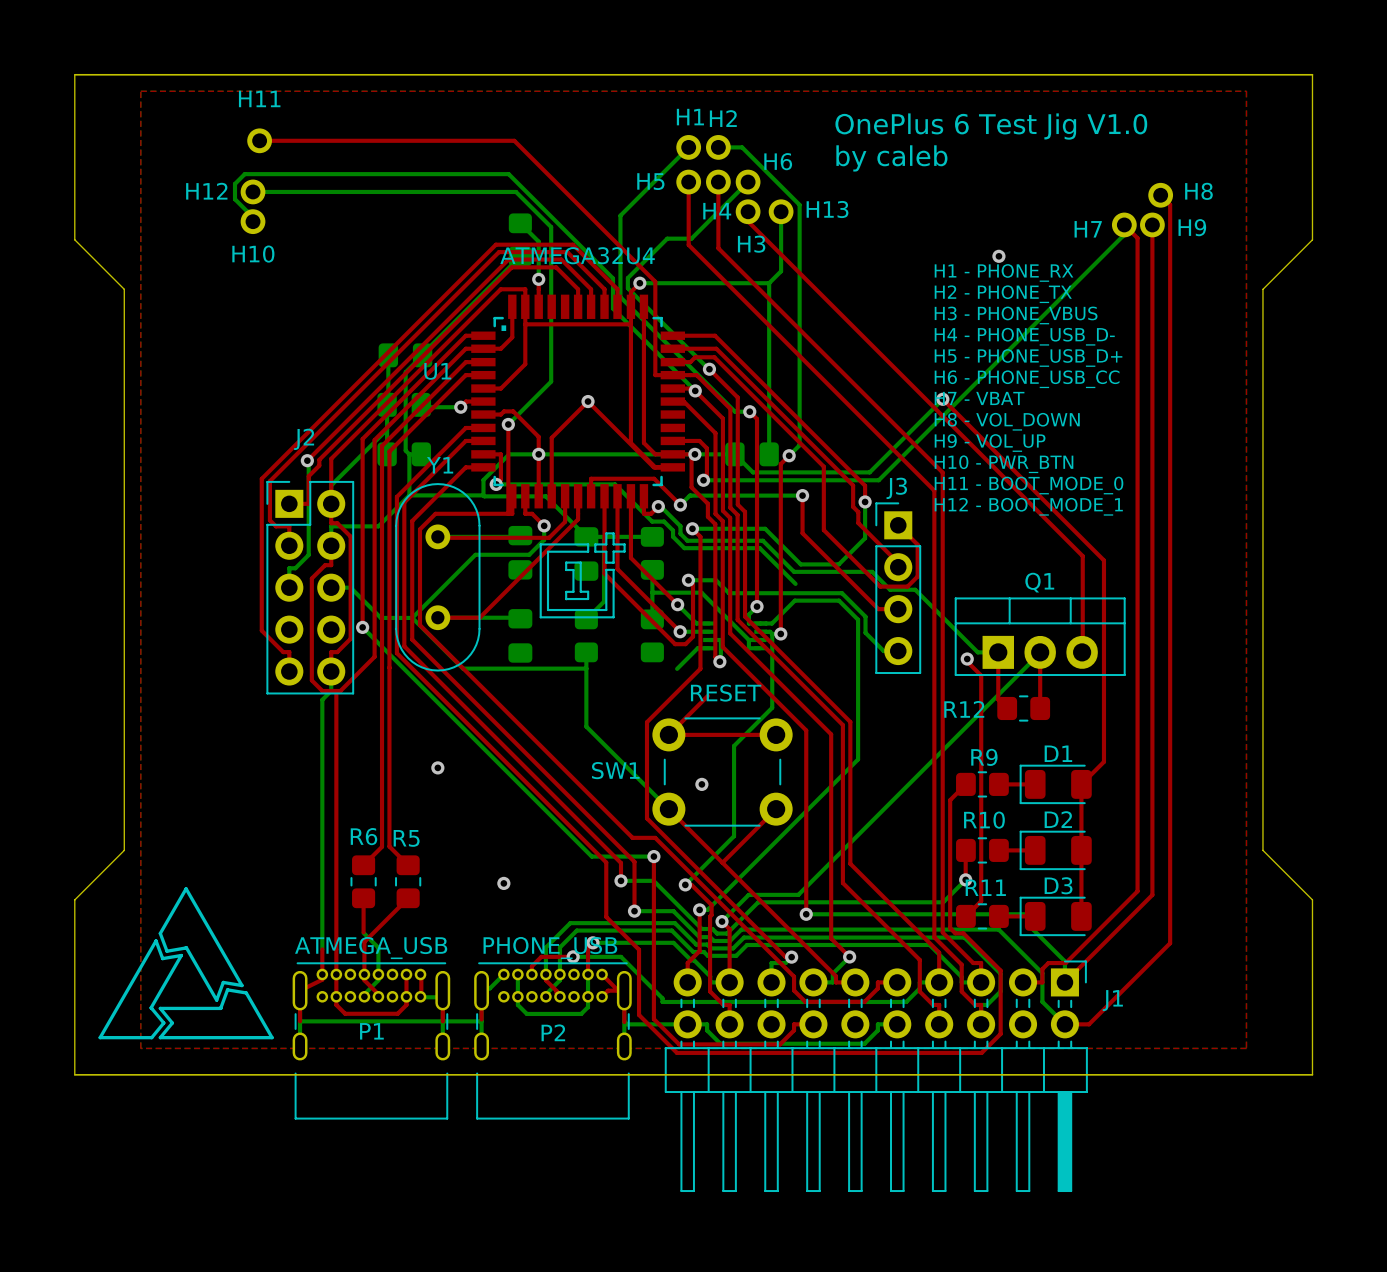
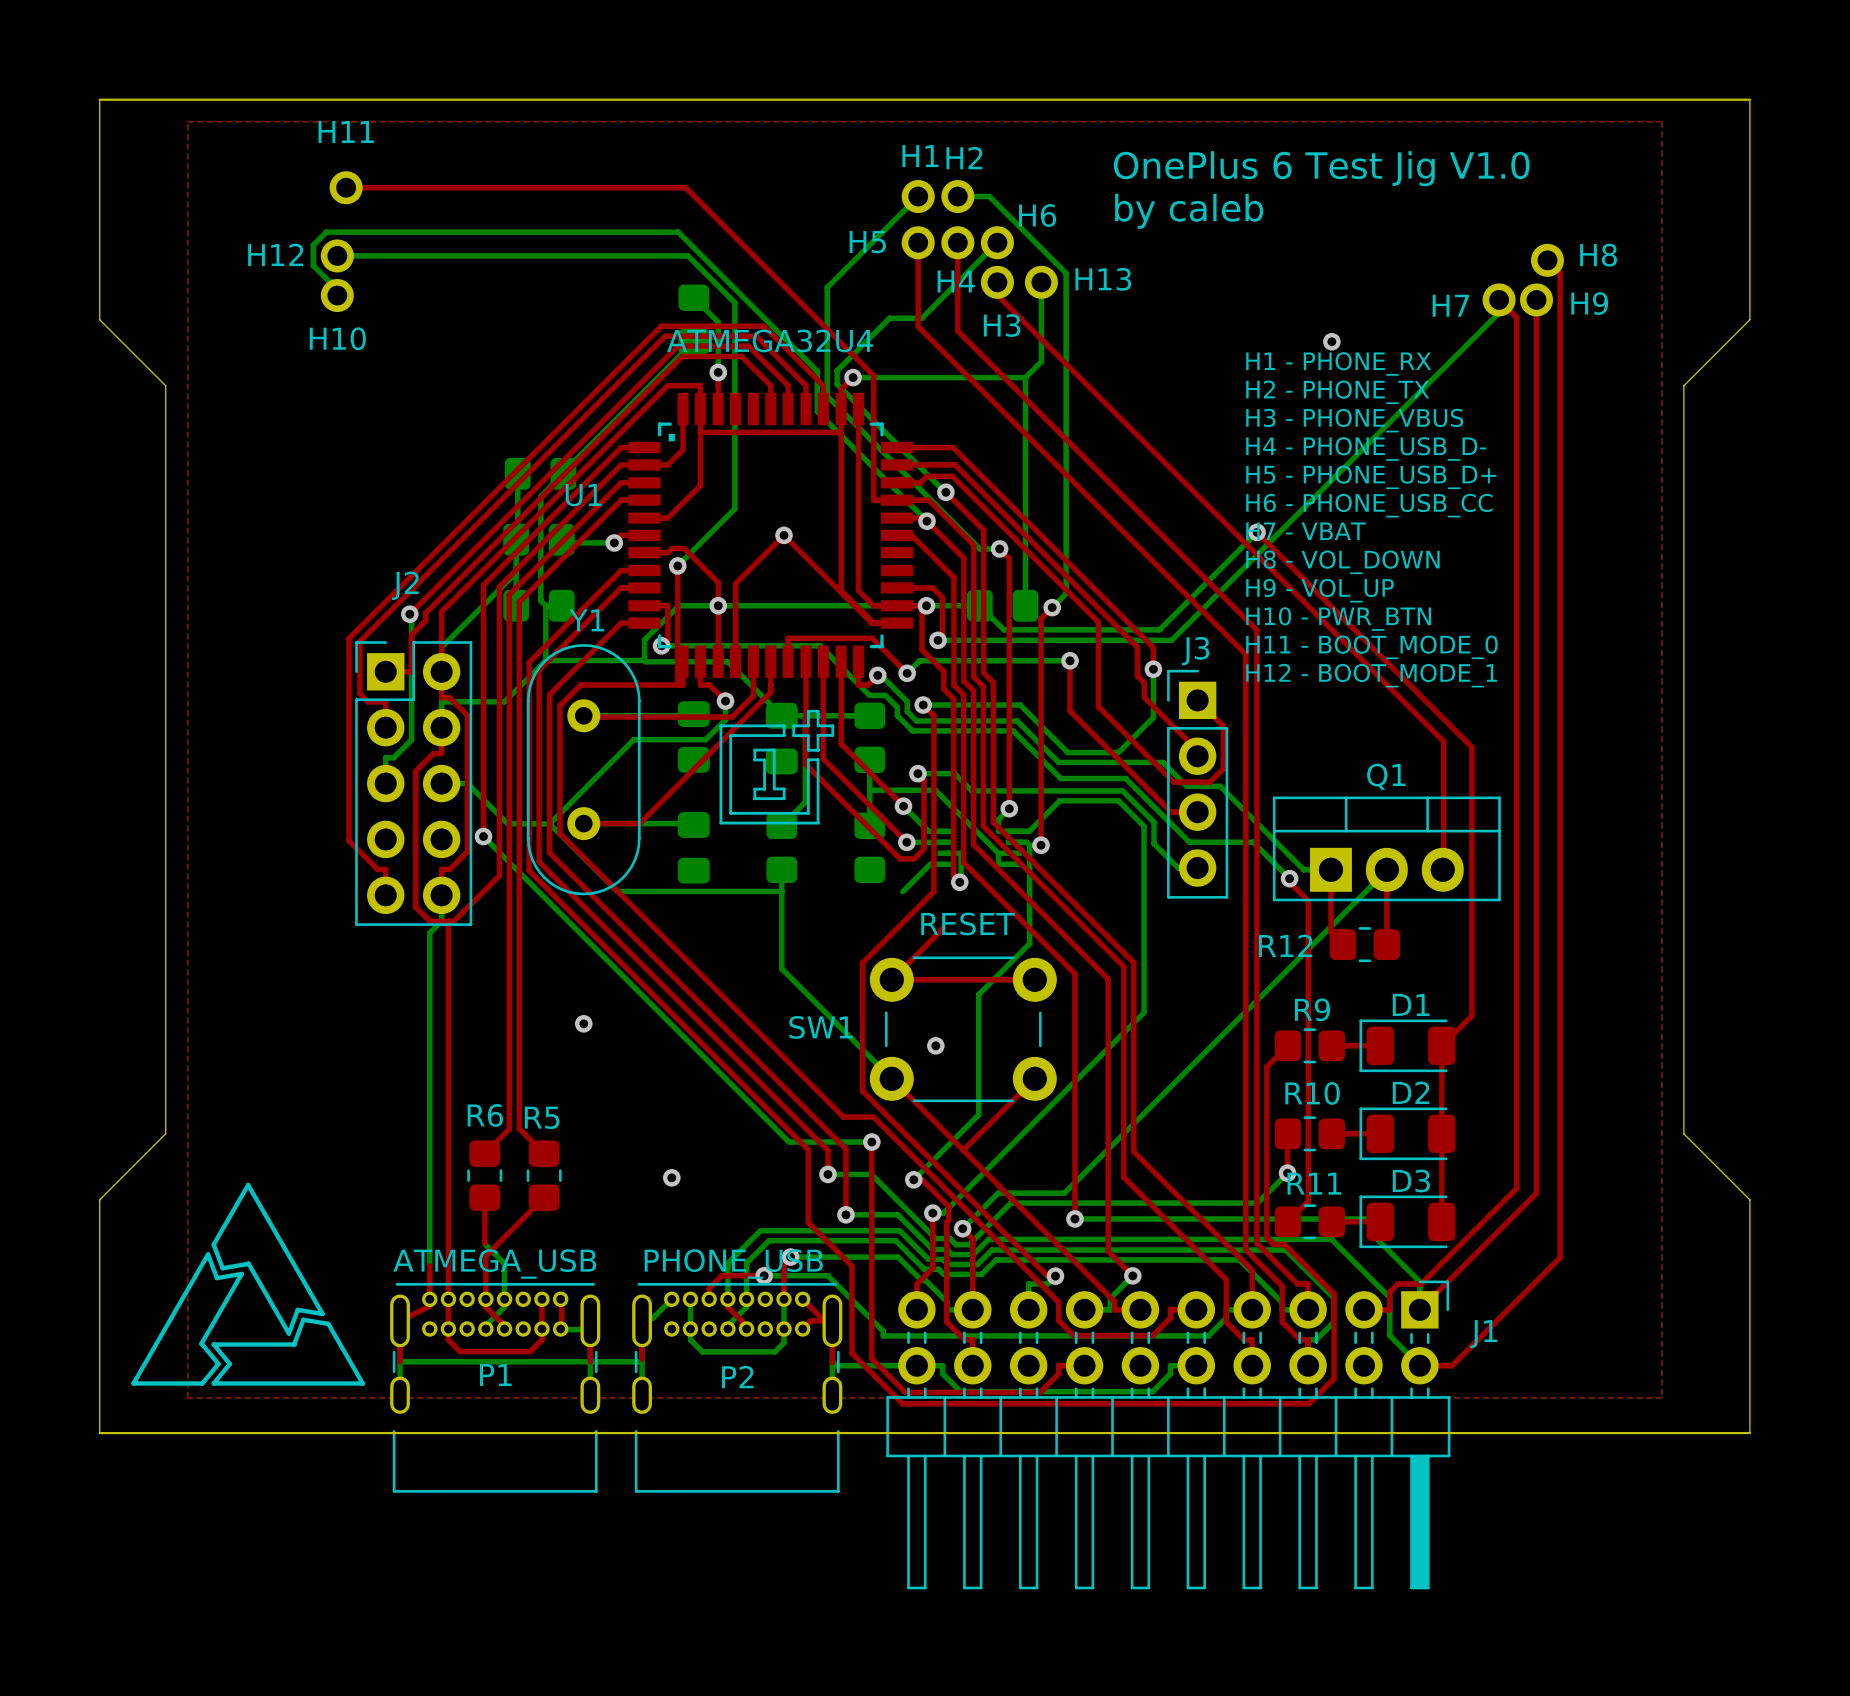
bottom track: none -> (1060, 778) (1125, 778) (1189, 842) (1253, 842) (1289, 878)

